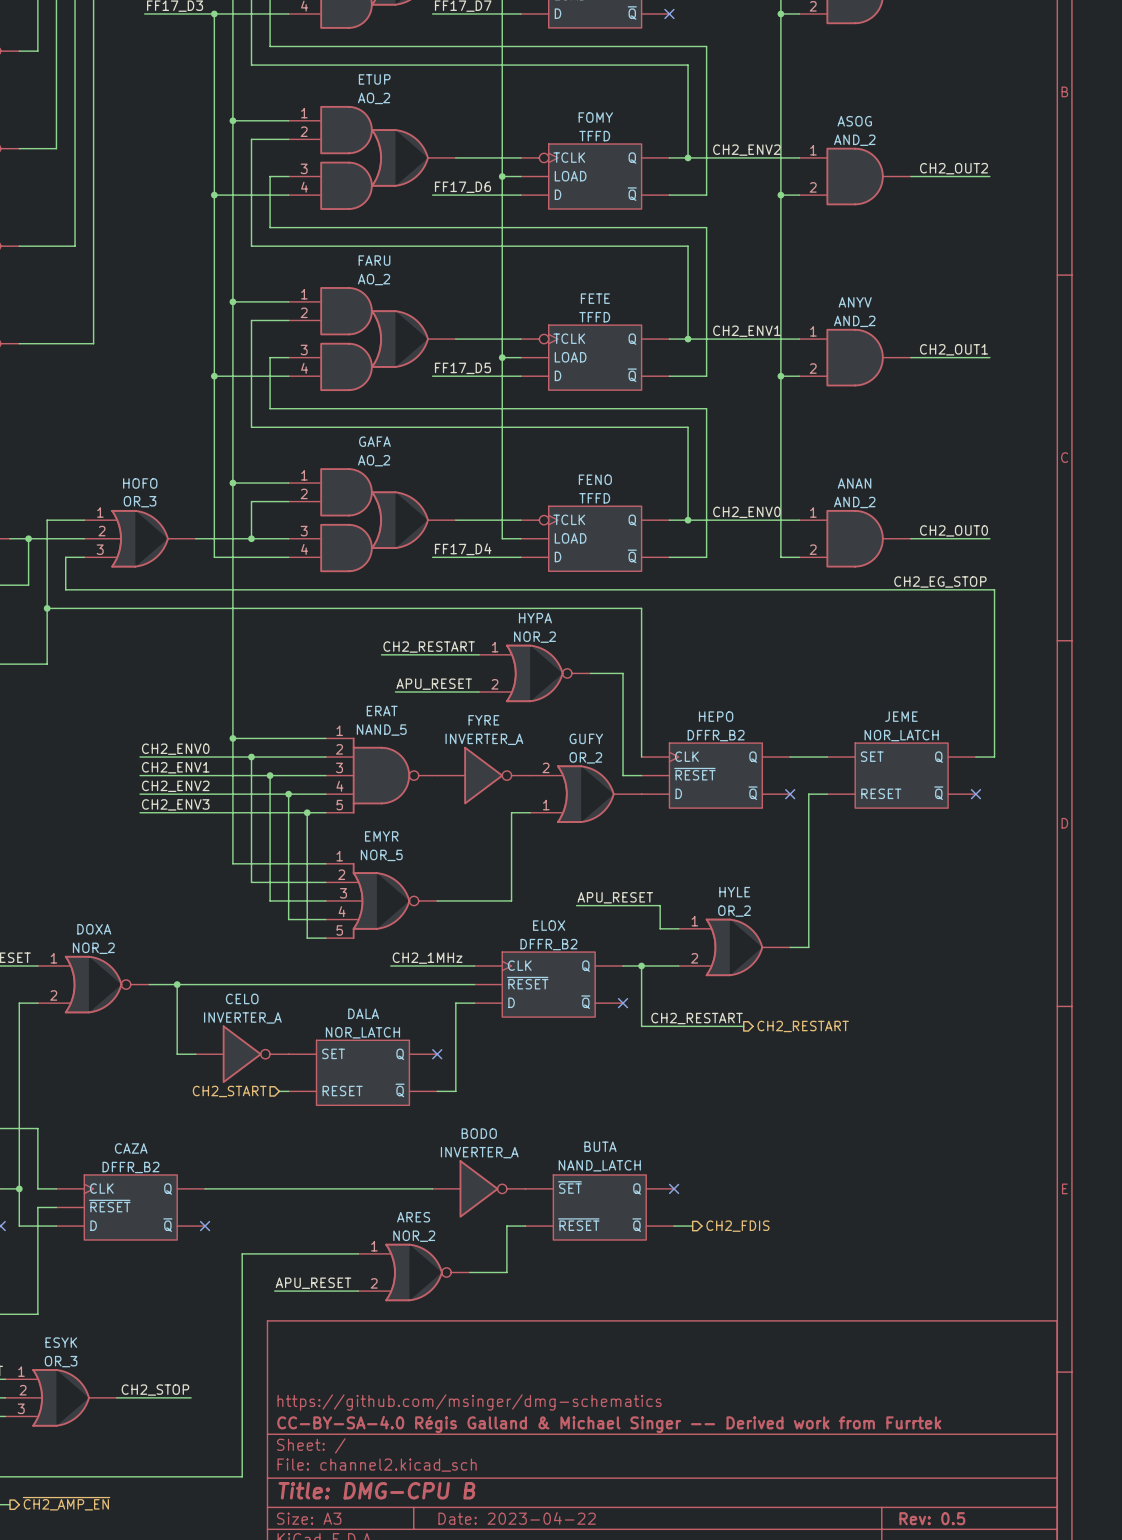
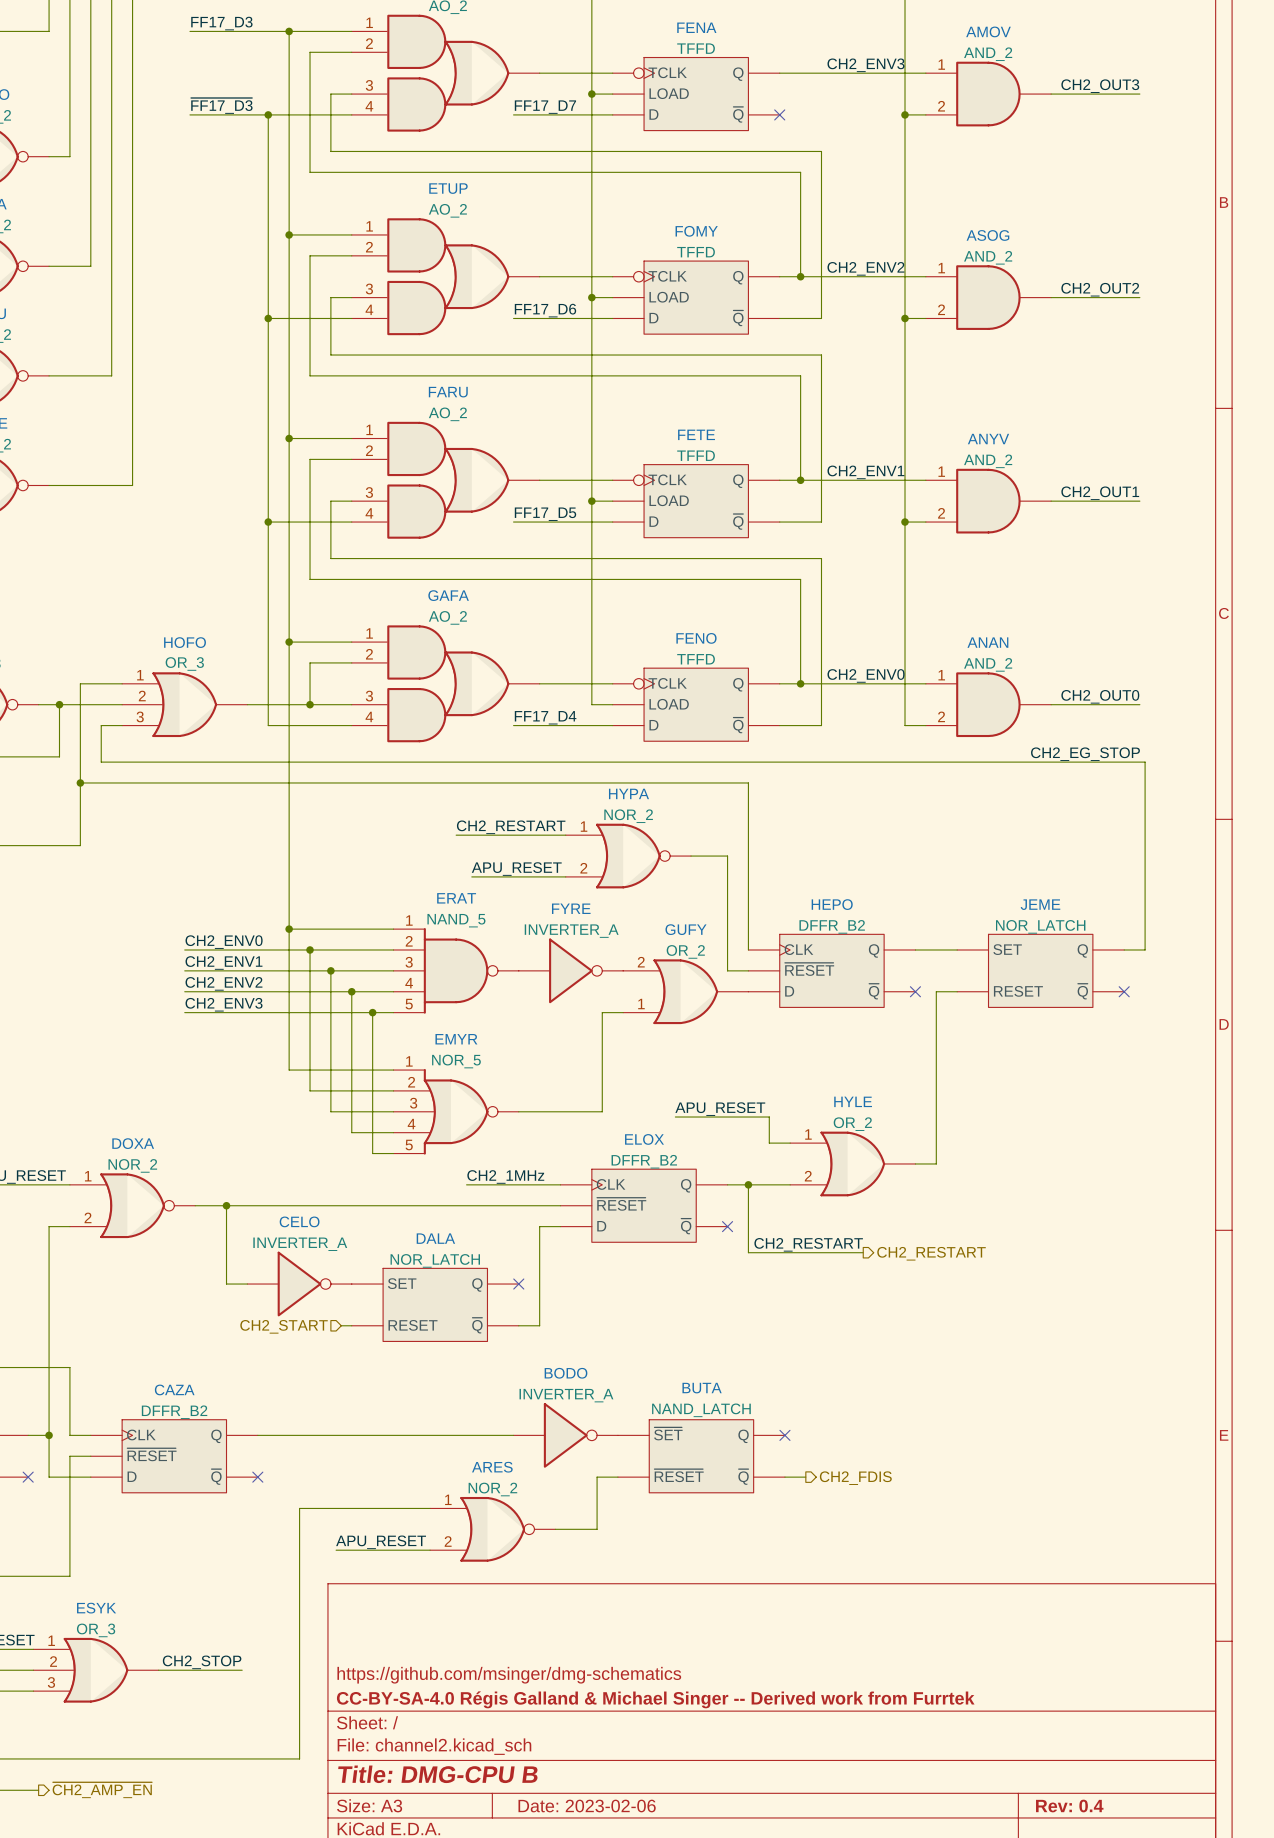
title block: Date: 2023-04-22 (517, 1518) -> Date: 2023-02-06 (587, 1806)
title block: Rev: 0.5 (932, 1518) -> Rev: 0.4 (1069, 1806)

